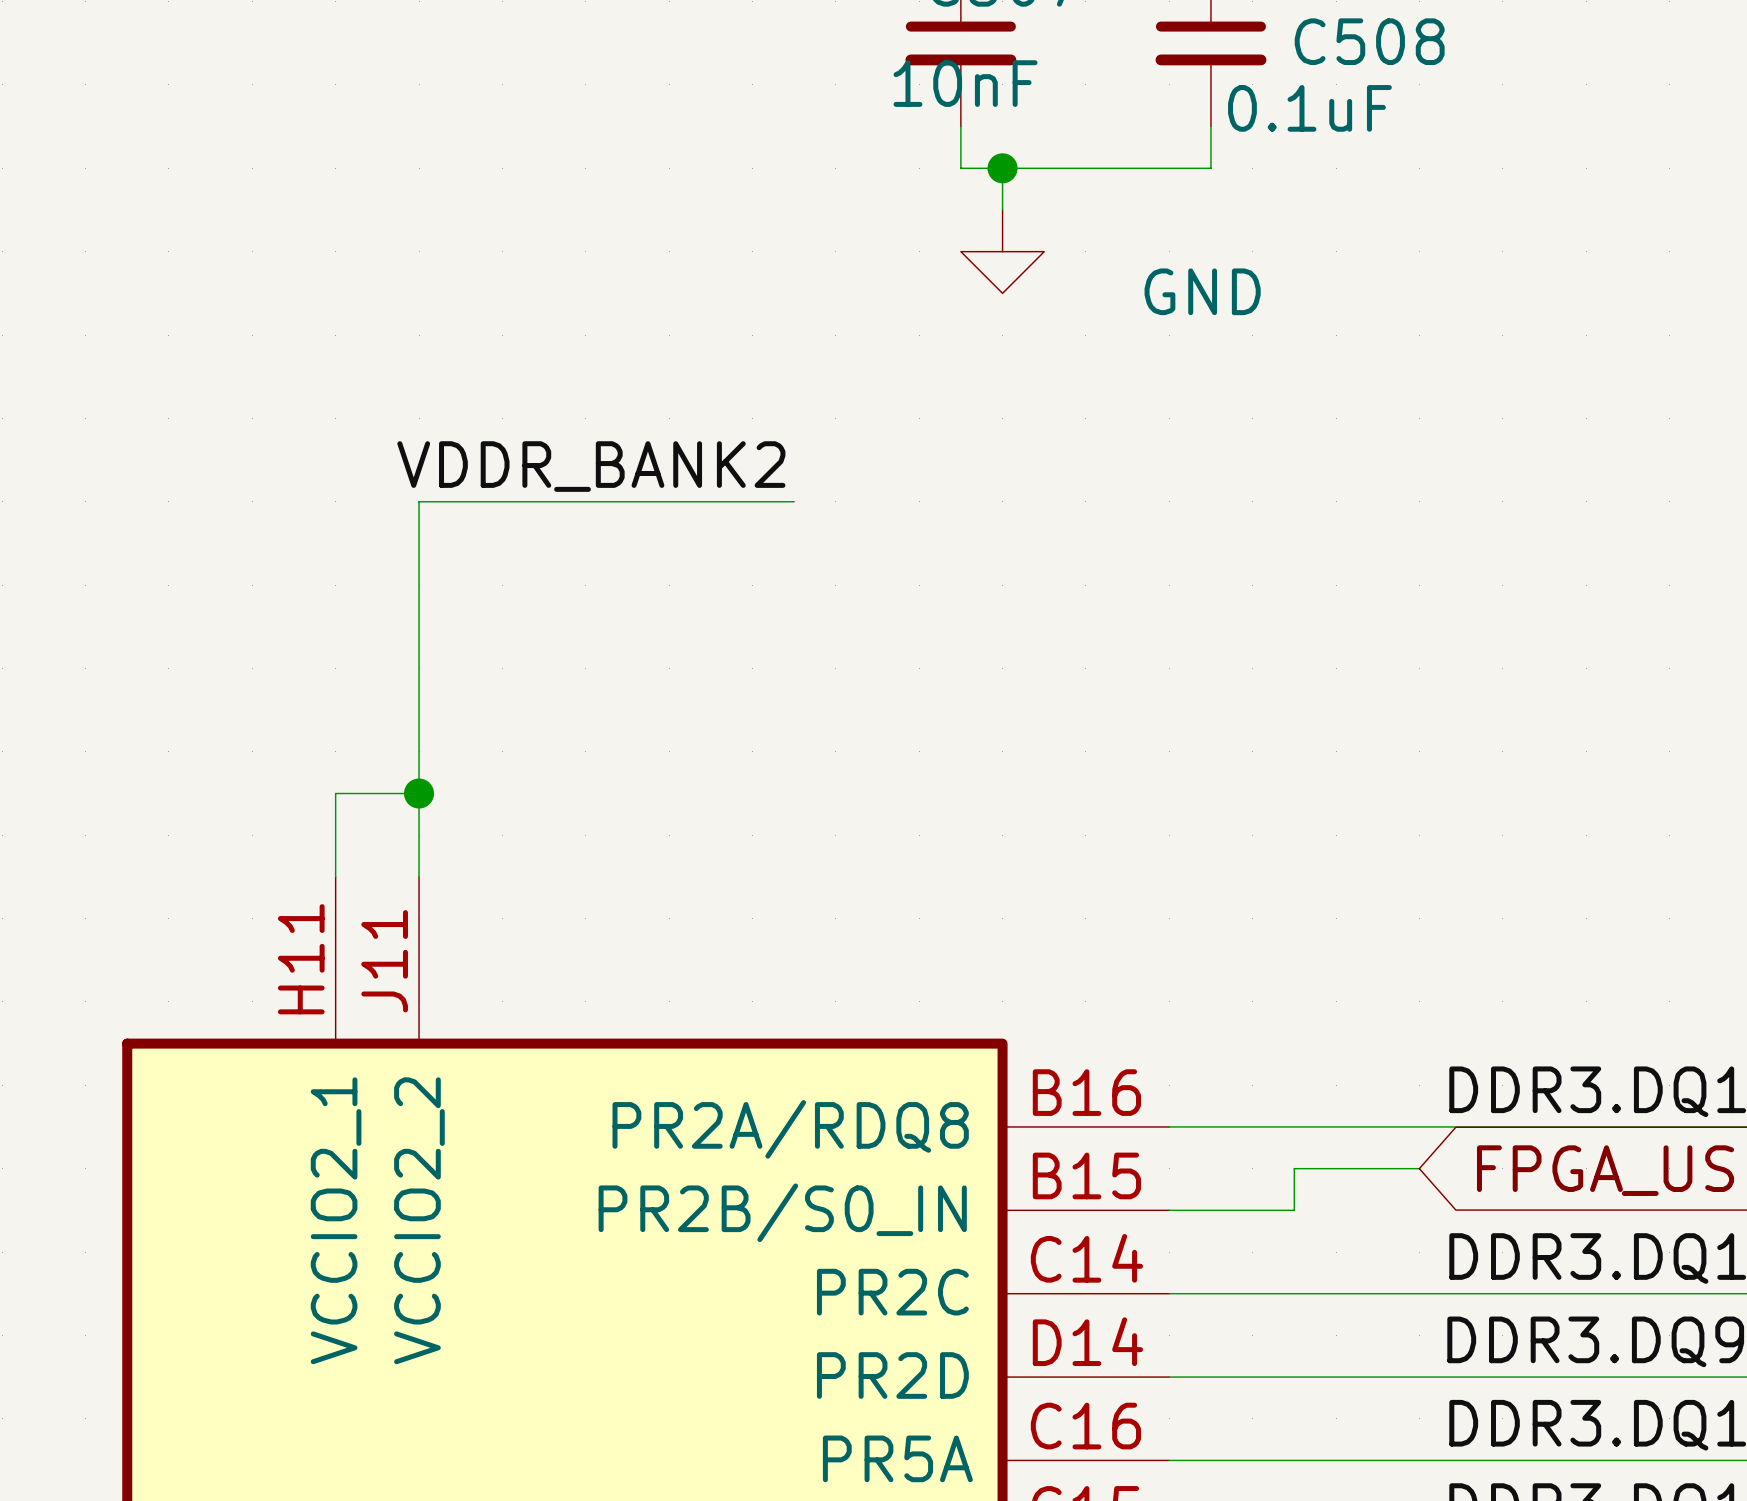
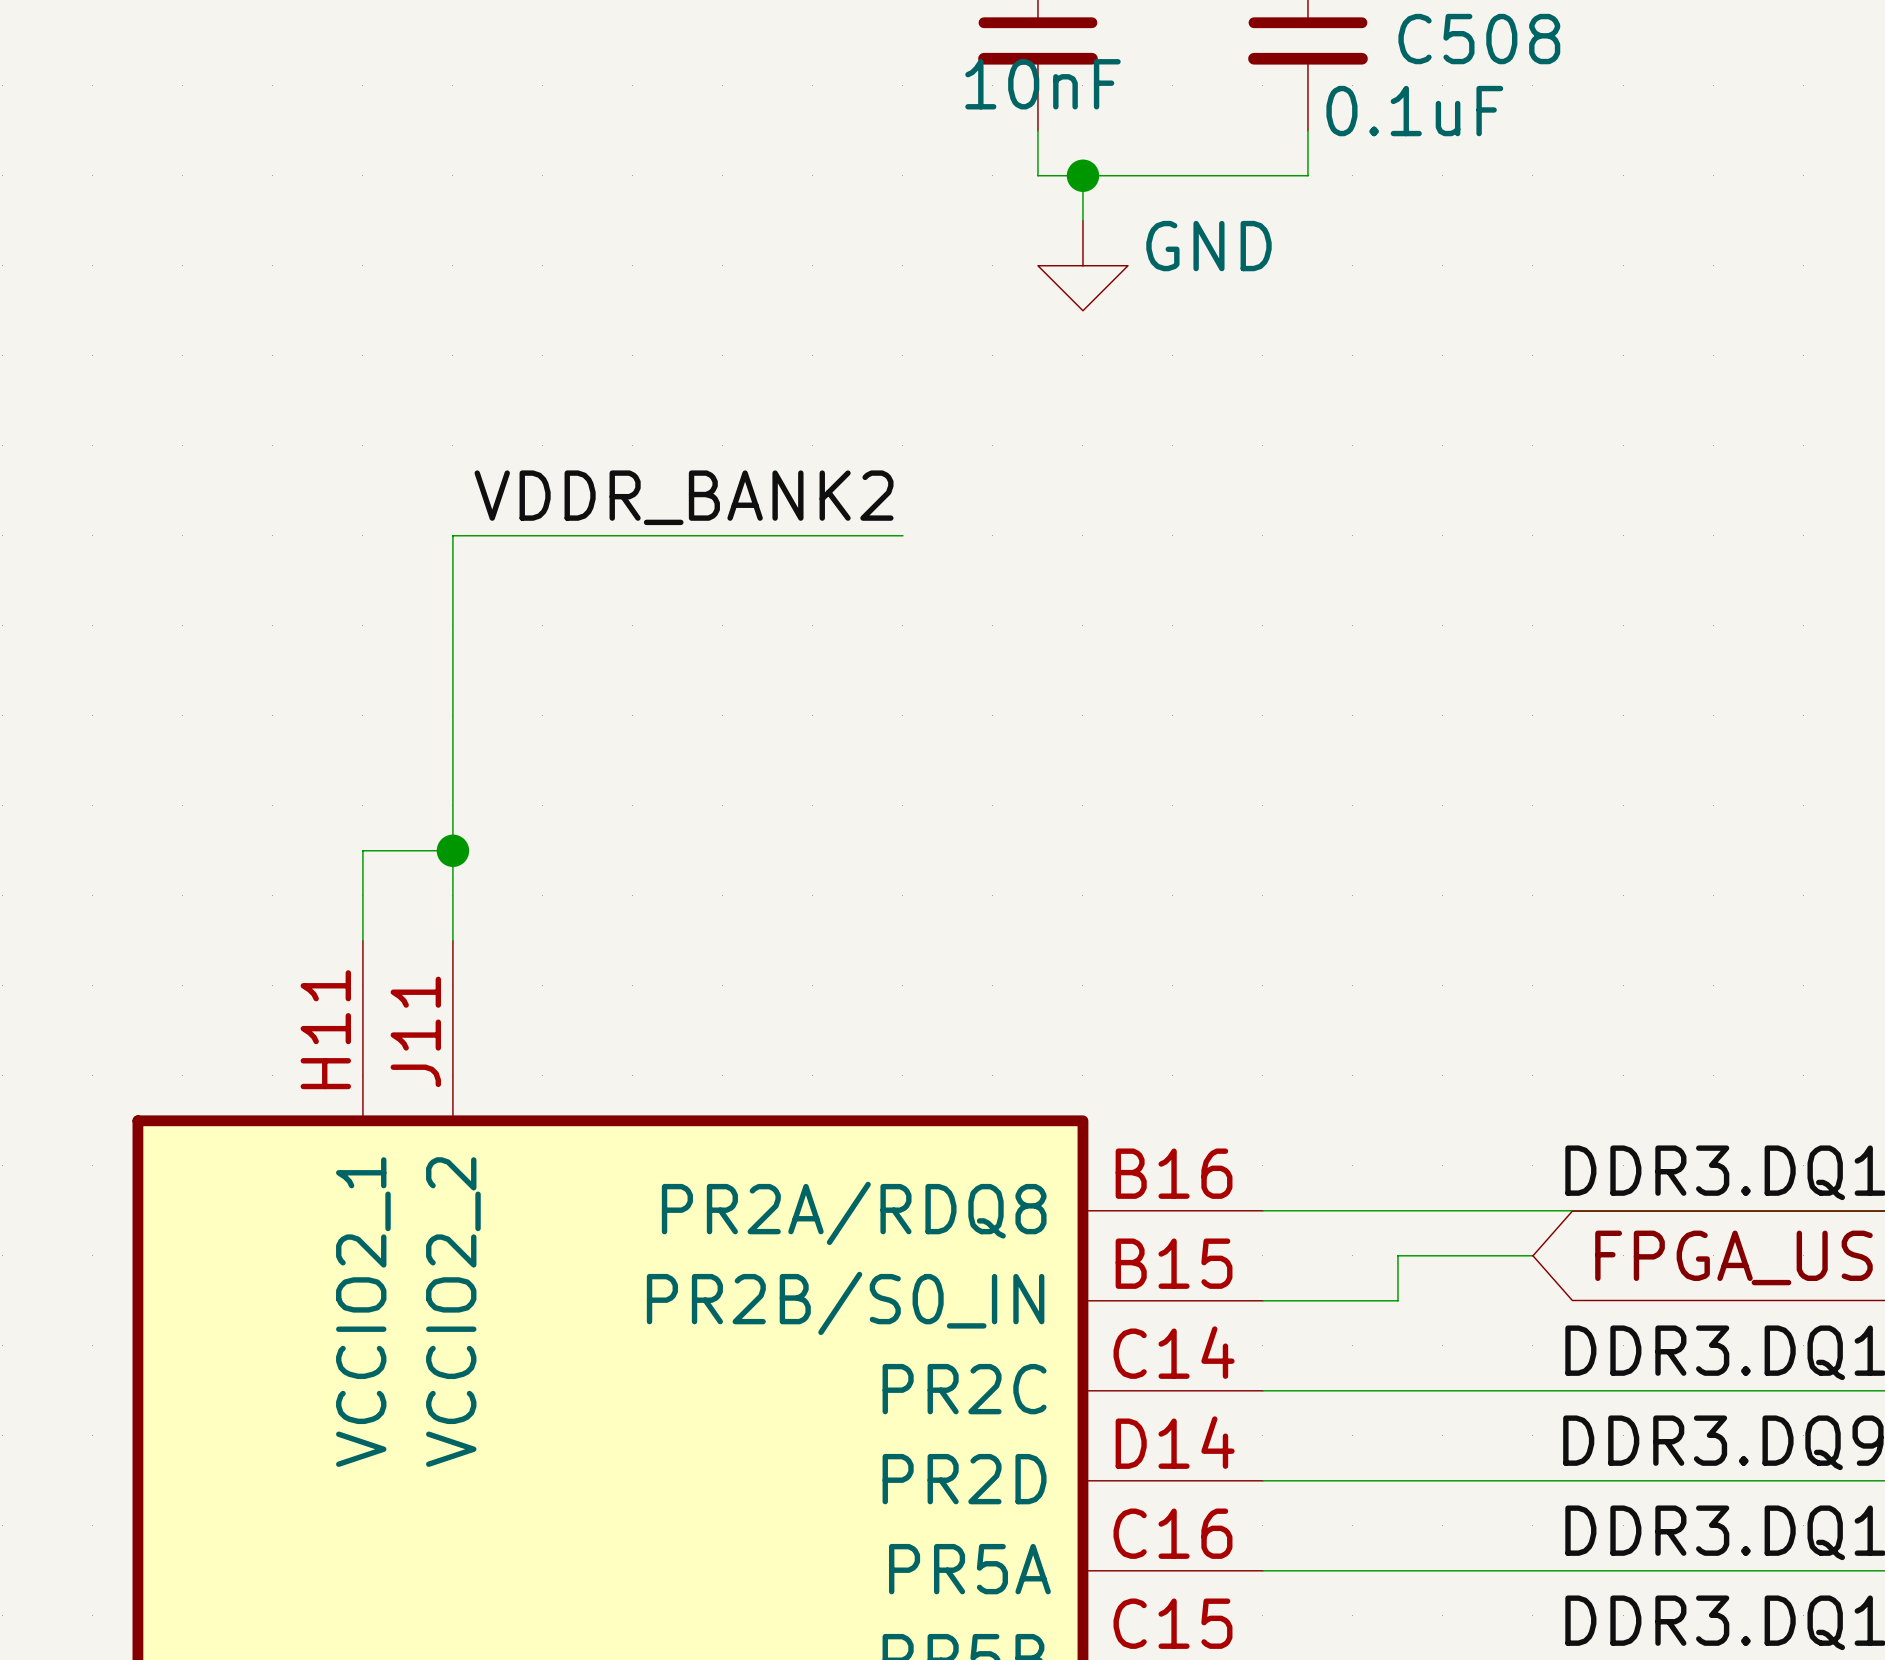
power symbol text position: GND (1202, 291) -> GND (1208, 246)
label position: VDDR_BANK2 (591, 466) -> VDDR_BANK2 (684, 497)
wire: none -> (857, 535) (902, 535)

